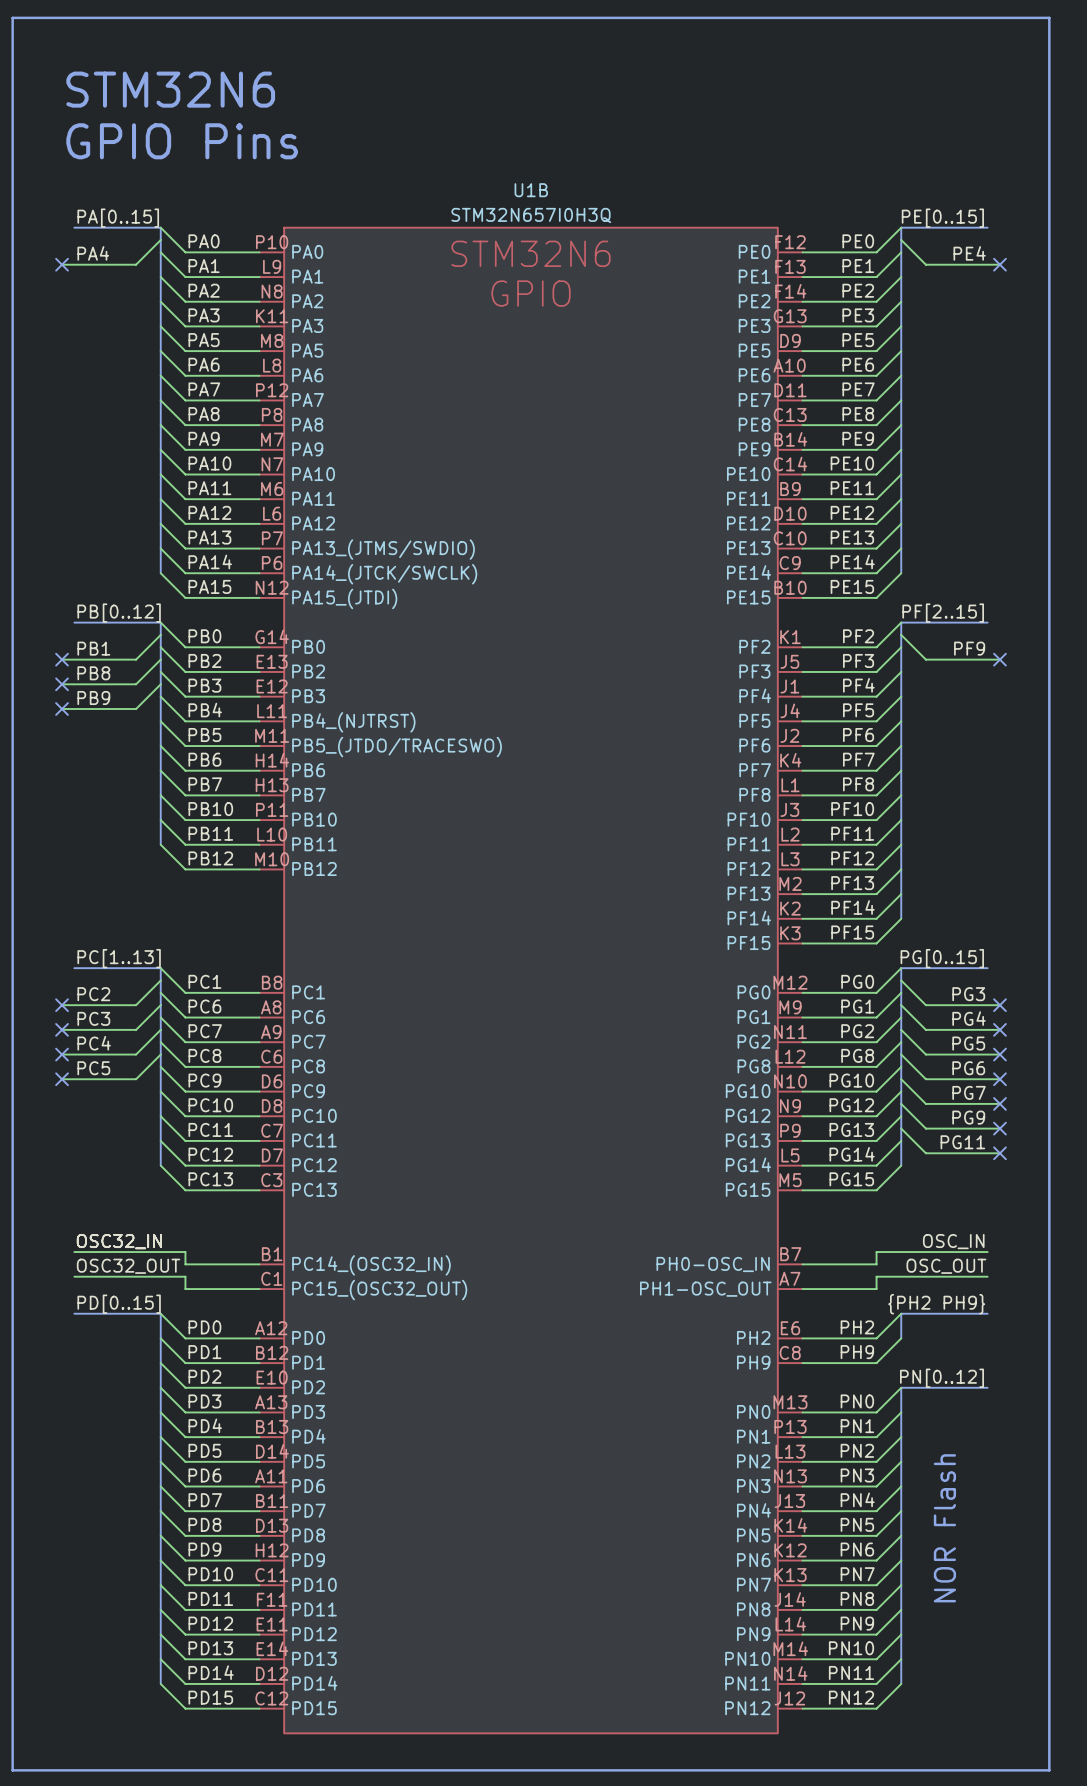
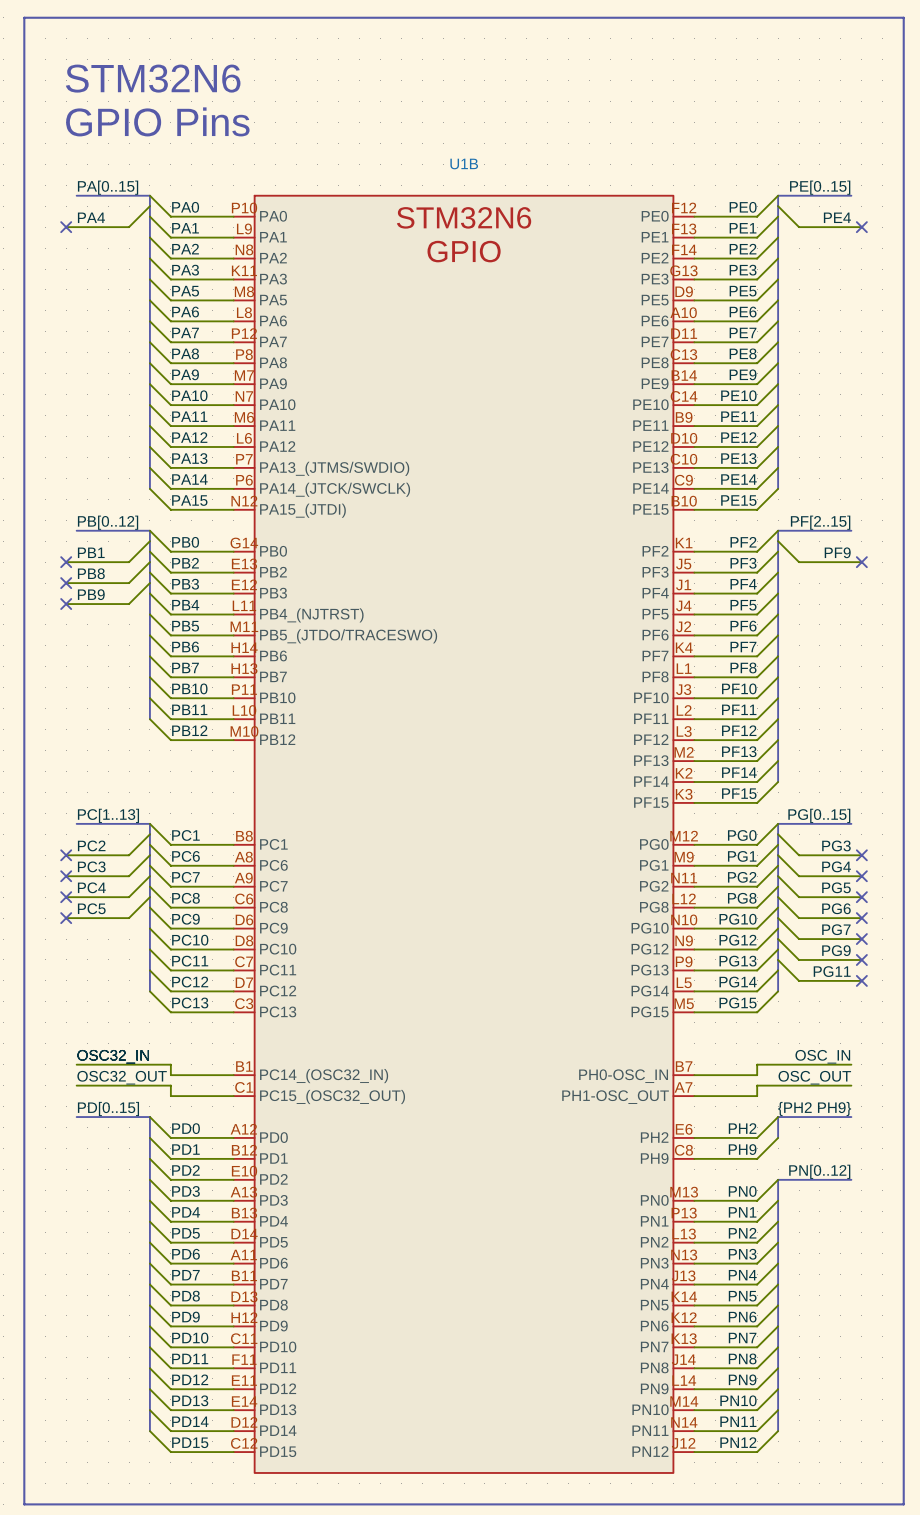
U1B value: STM32N657I0H3Q (531, 215) -> none
text: NOR Flash (944, 1528) -> none

